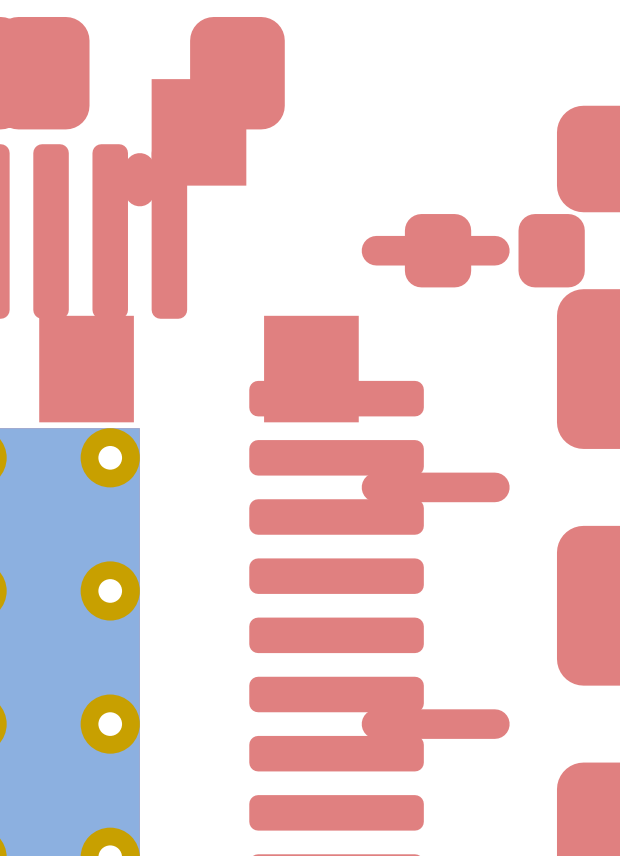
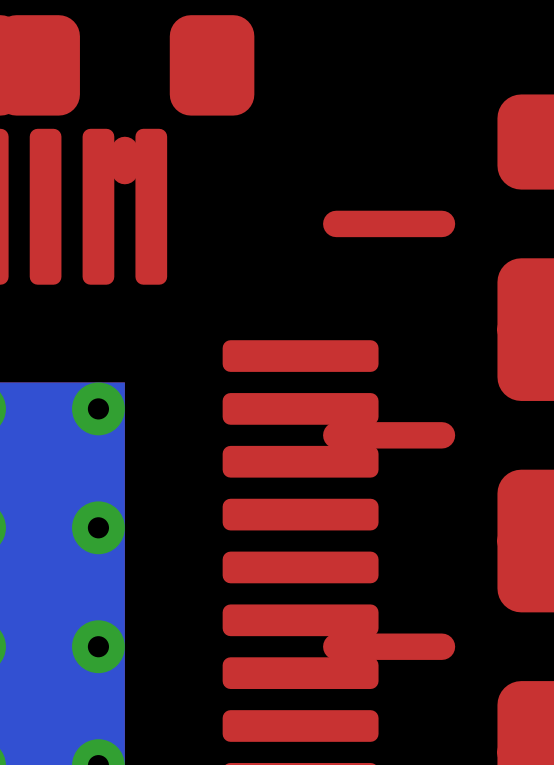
part: (198, 250) -> none
part: (494, 250) -> none

